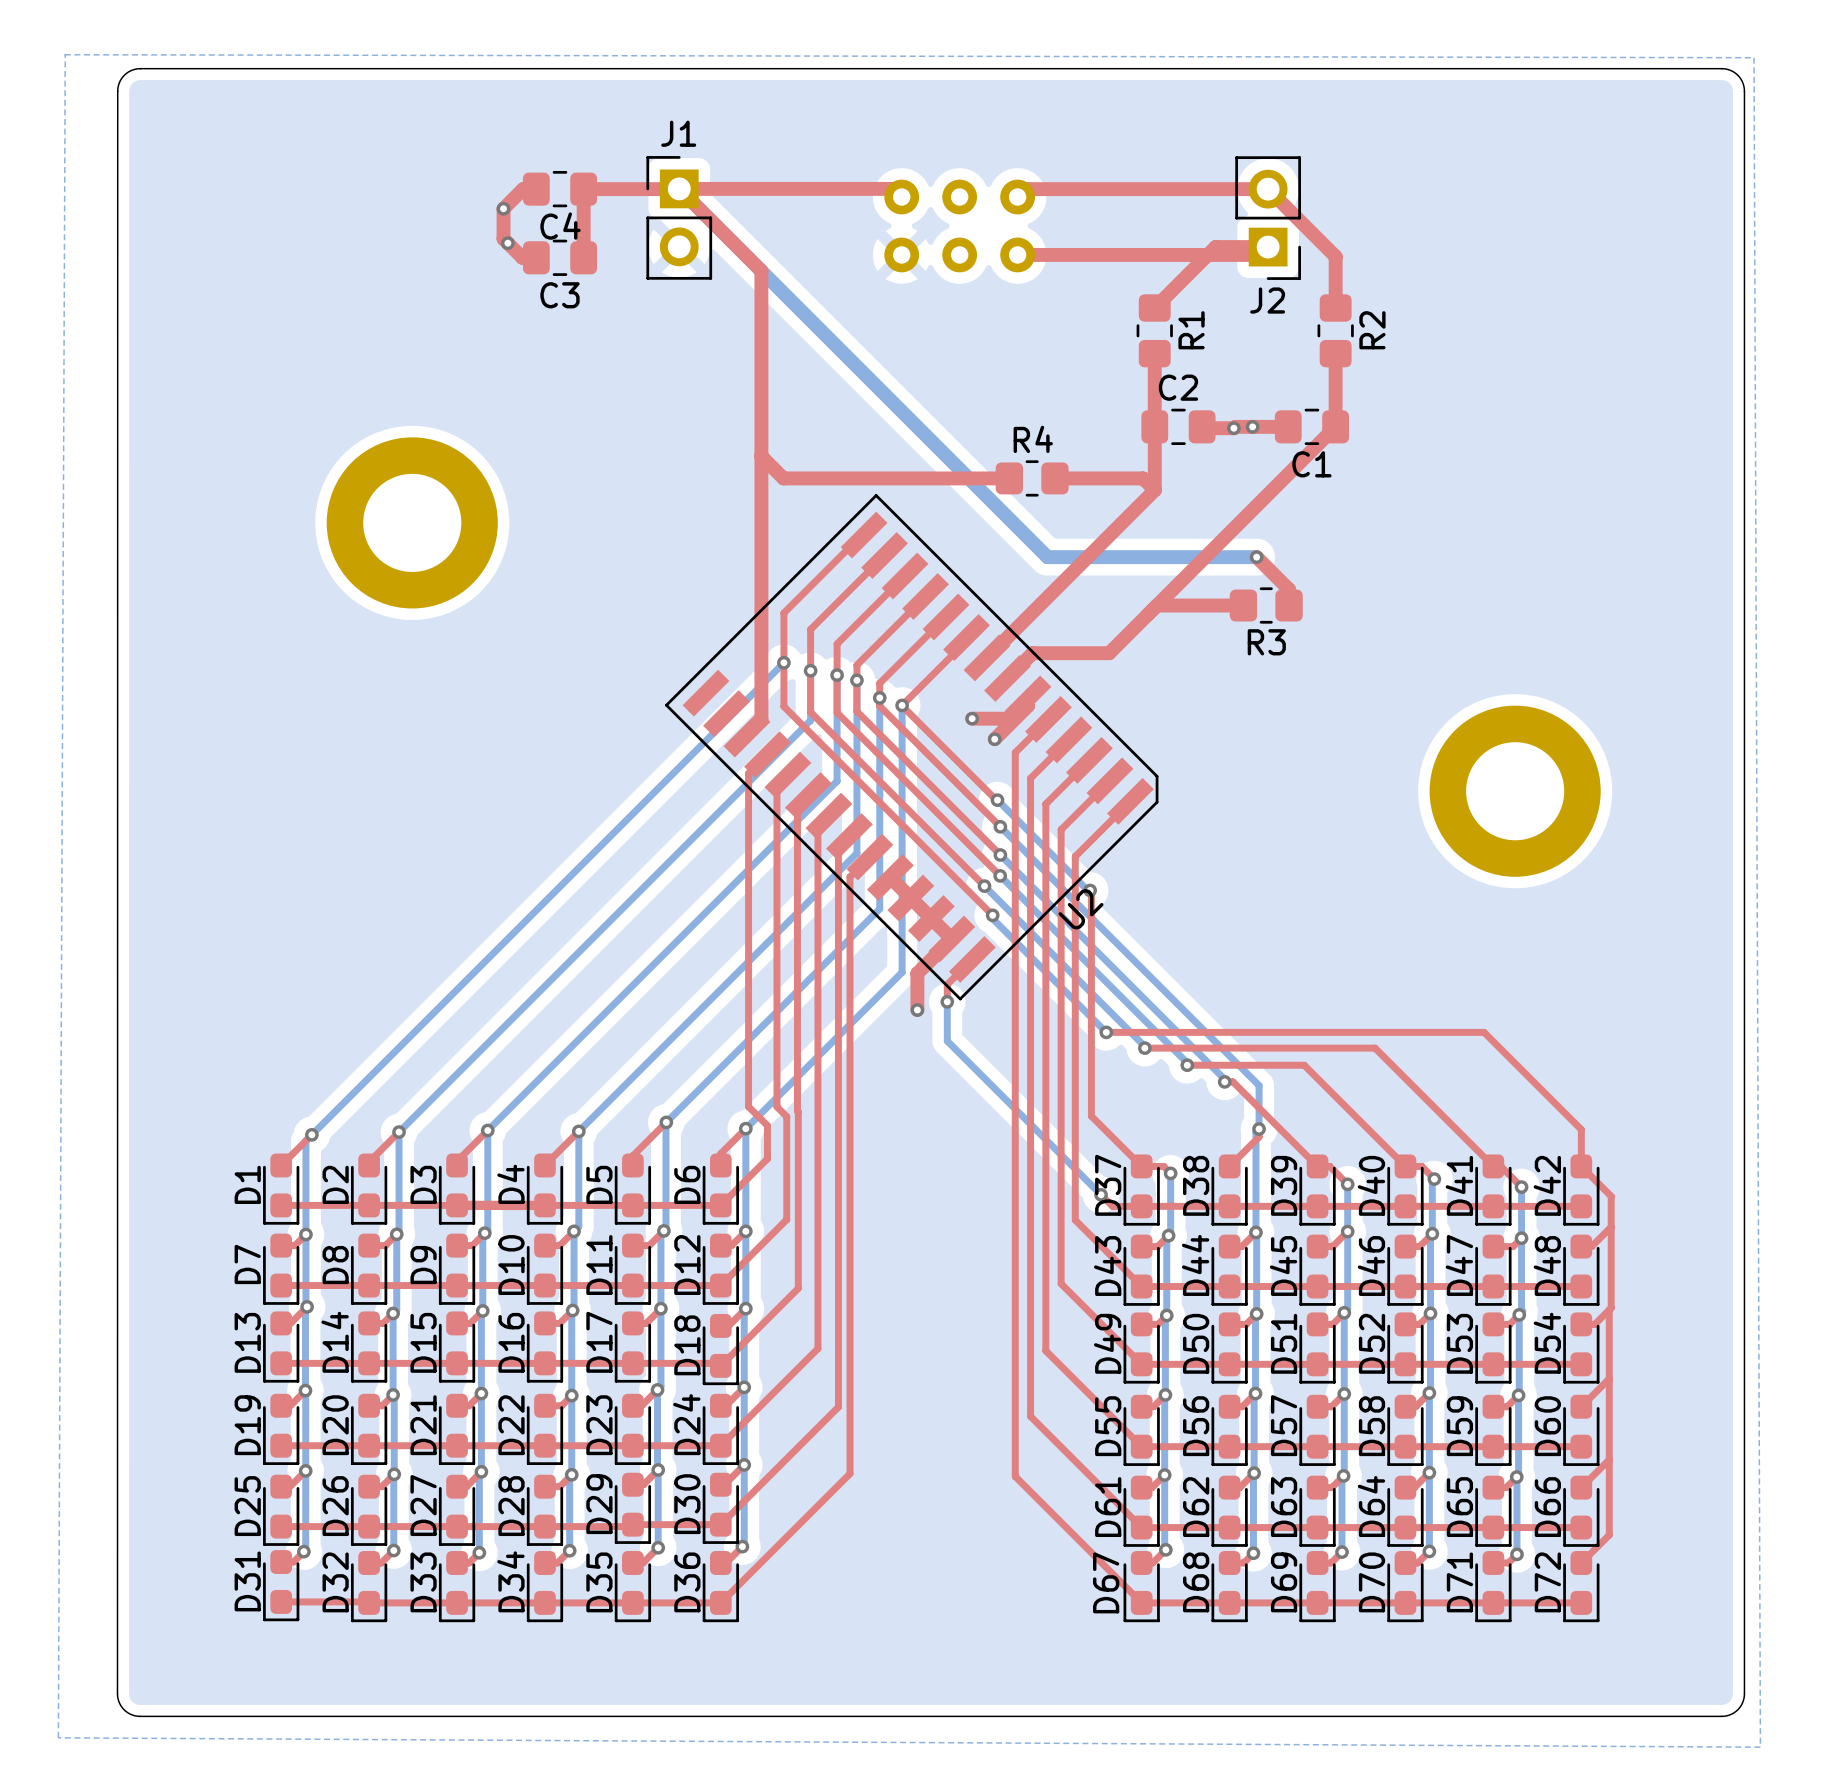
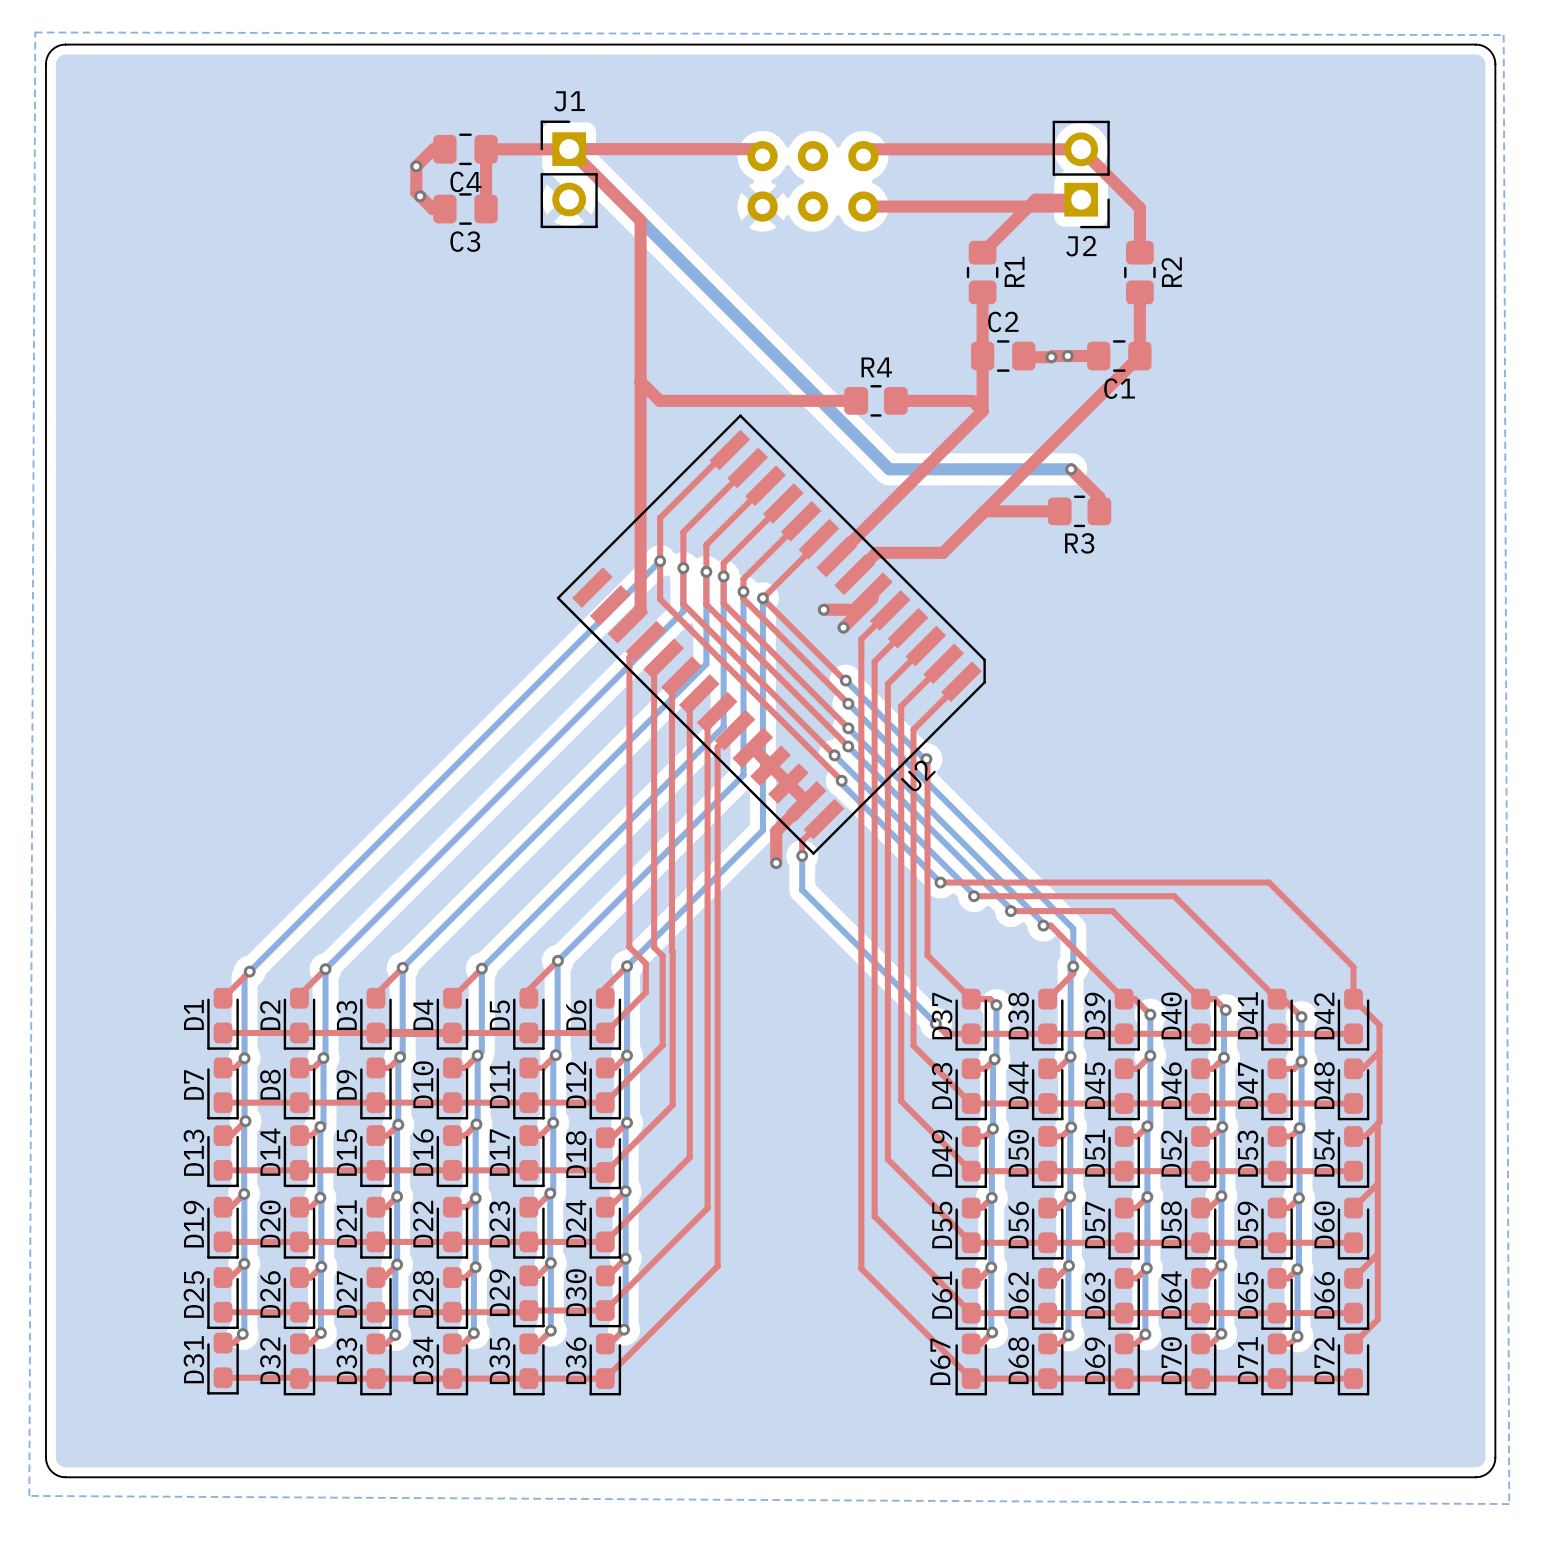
board edge: (140, 68) (130, 70) (124, 75) (119, 81) (117, 91) (117, 1693) (118, 1701) (124, 1709) (130, 1714) (140, 1716) -> (100, 44) (59, 45) (50, 51) (45, 64) (45, 1457) (50, 1469) (59, 1476) (100, 1477)
part: (412, 522) -> none
part: (1515, 791) -> none

